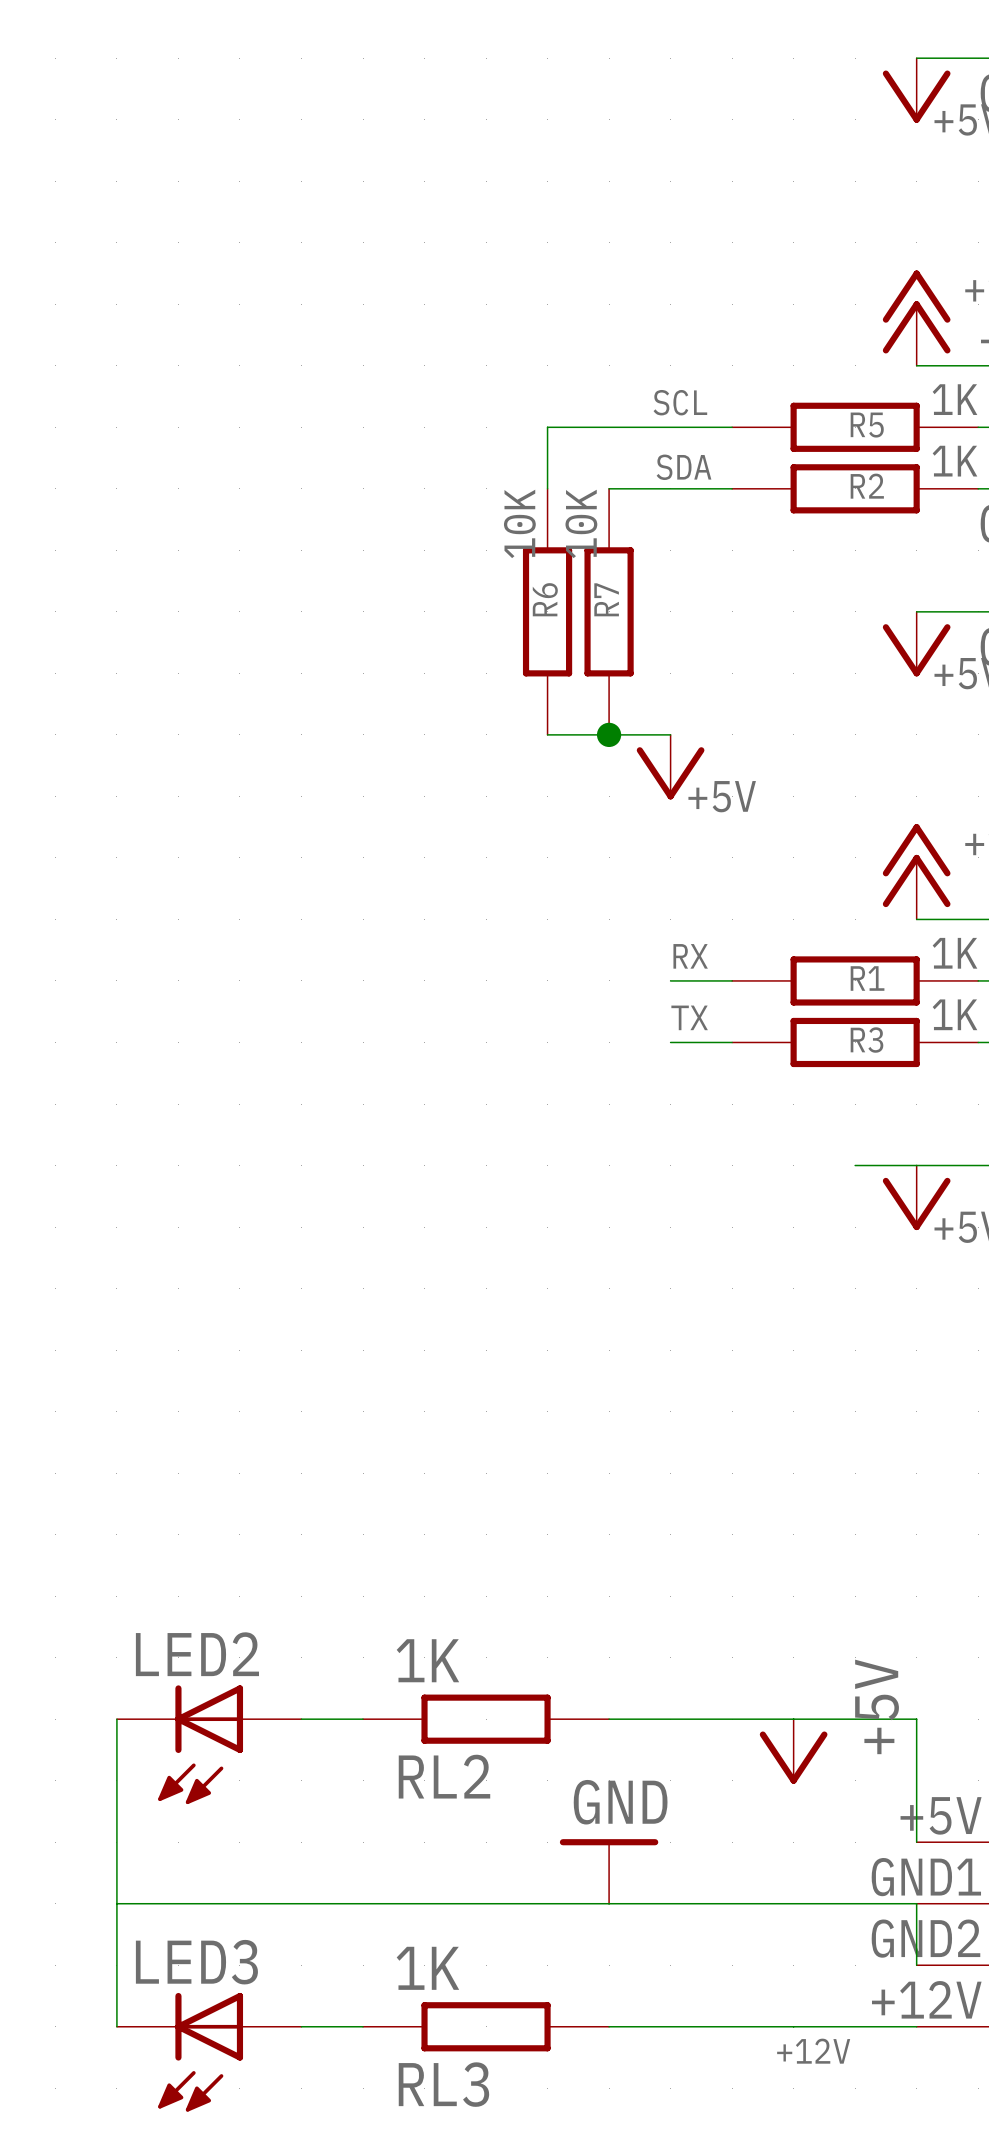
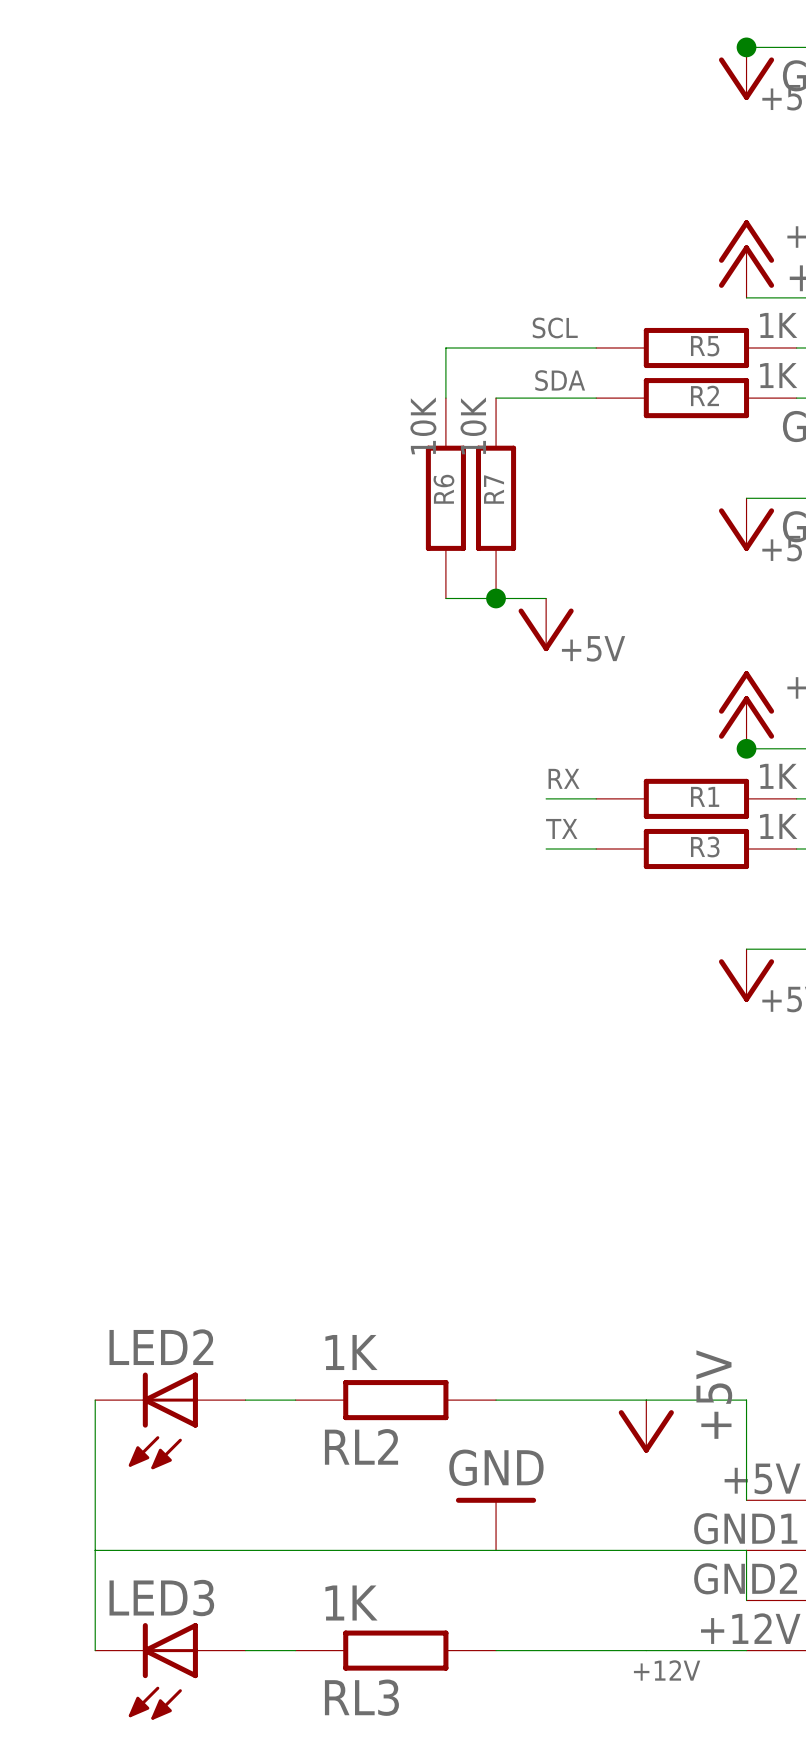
junction: none -> (746, 47)
junction: none -> (746, 748)
wire: (855, 1165) (916, 1165) -> none

